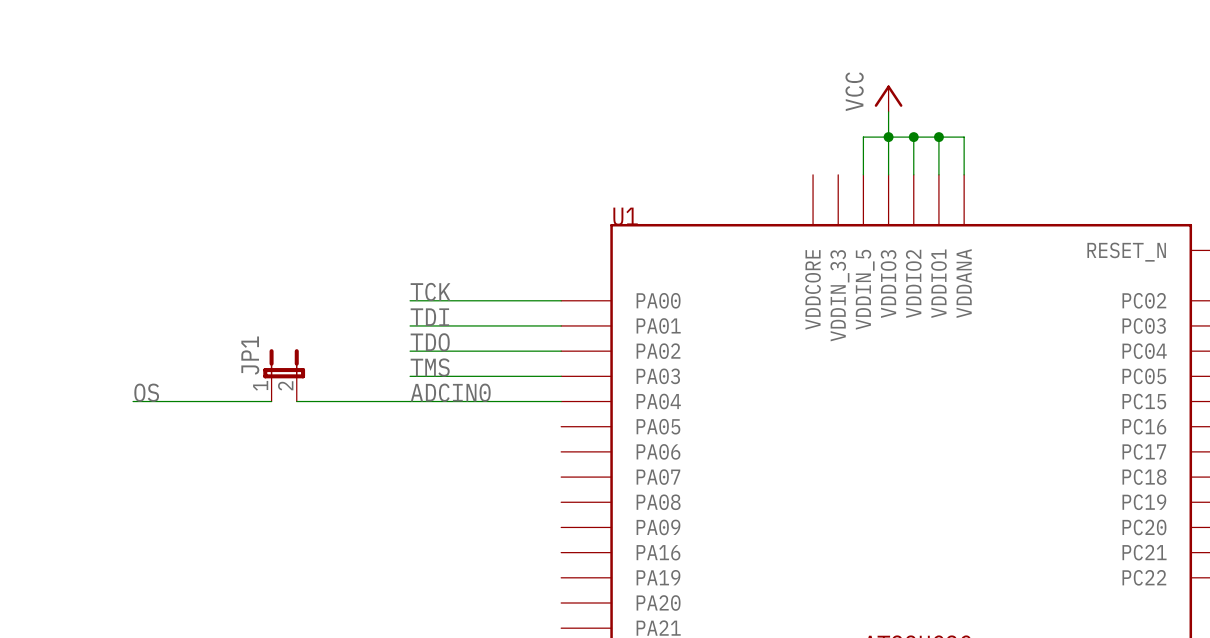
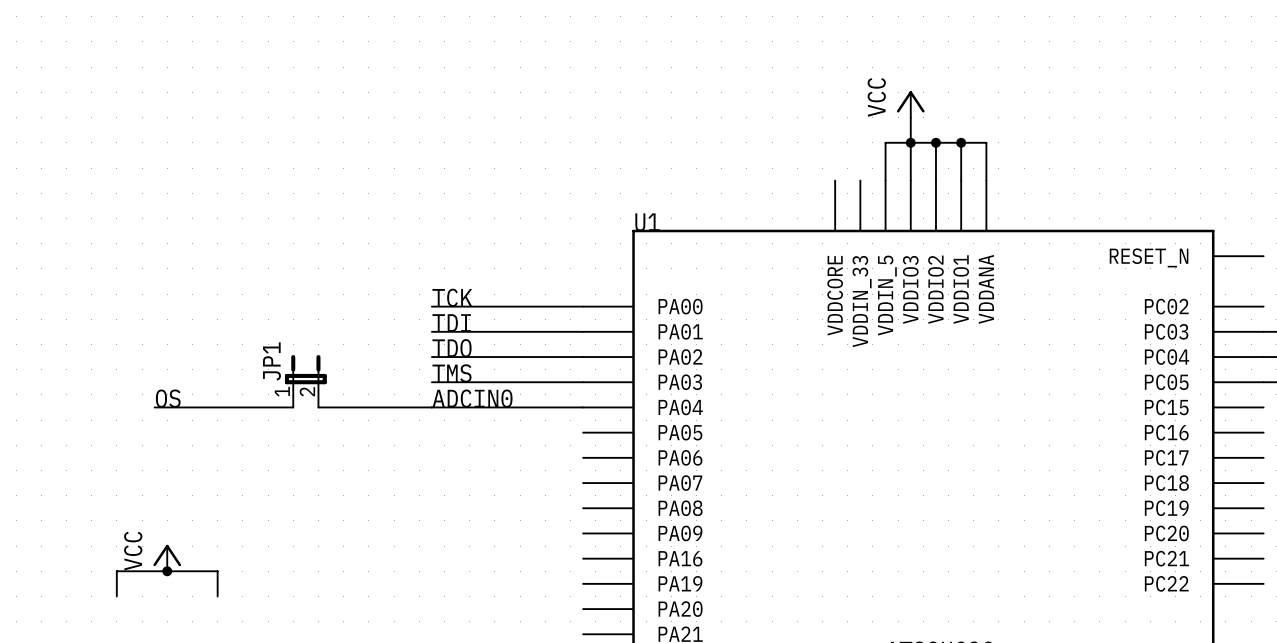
power symbol: none -> VCC (167, 558)
junction: none -> (167, 571)
wire: none -> (116, 596) (116, 571) (217, 571) (217, 596)

